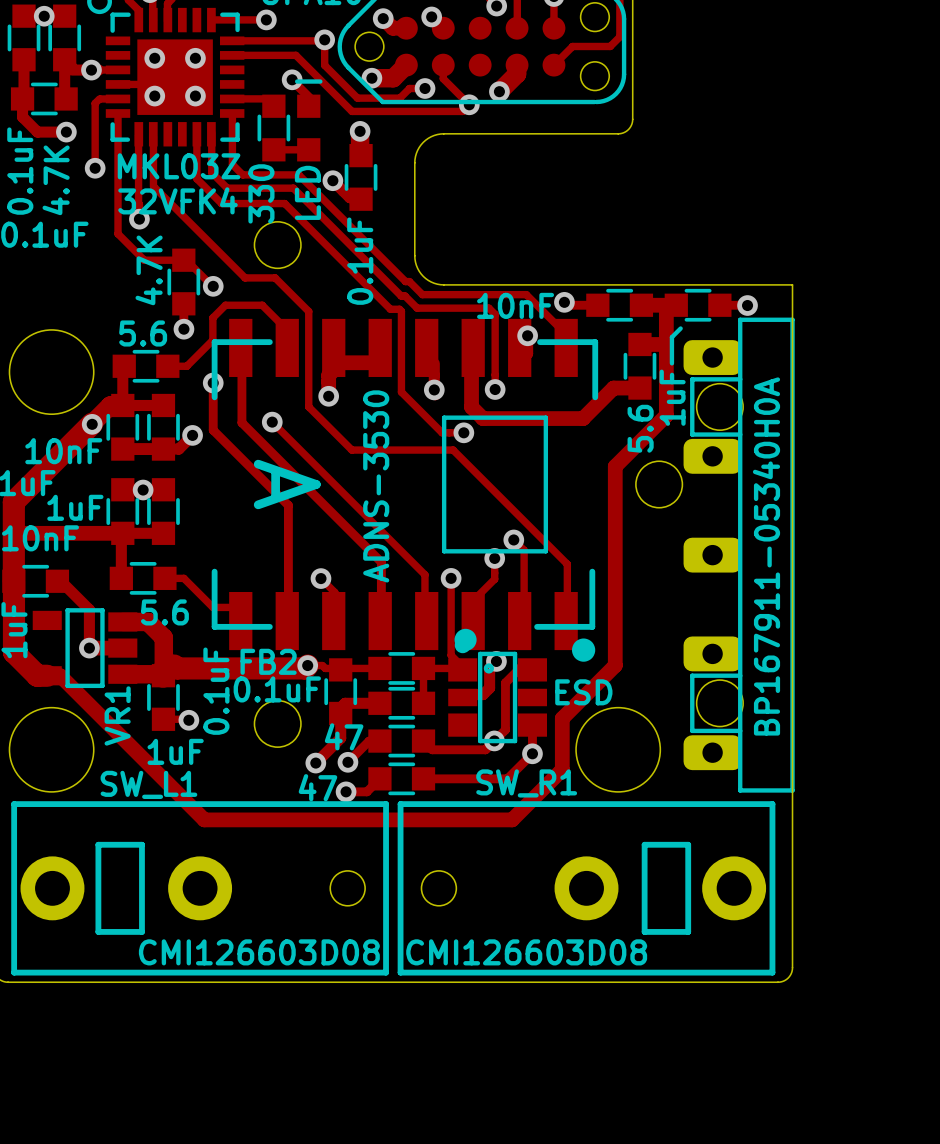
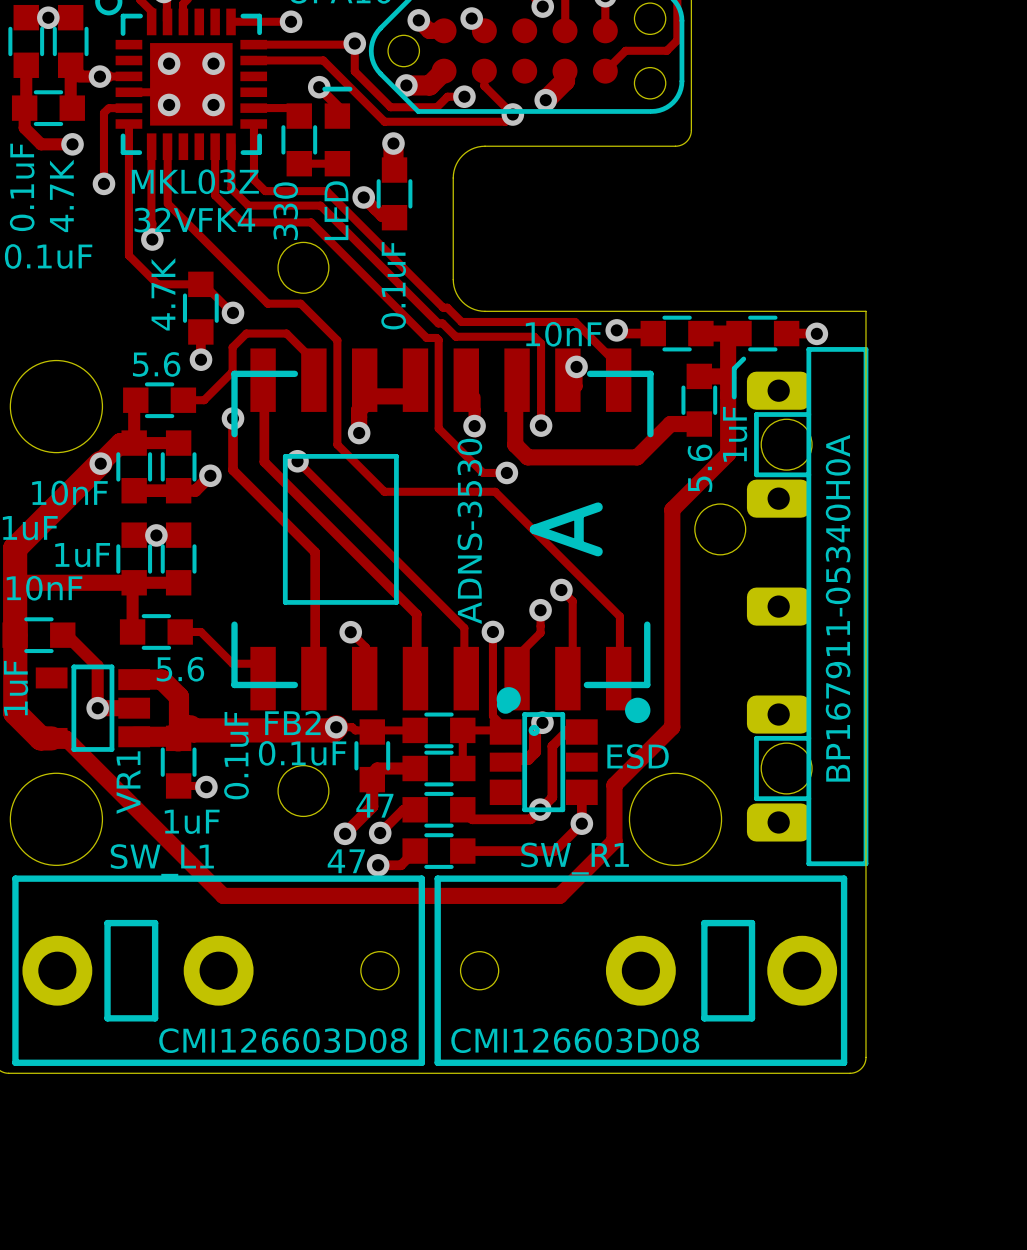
part footprint: [211, 318, 599, 662] -> [231, 348, 654, 724]

